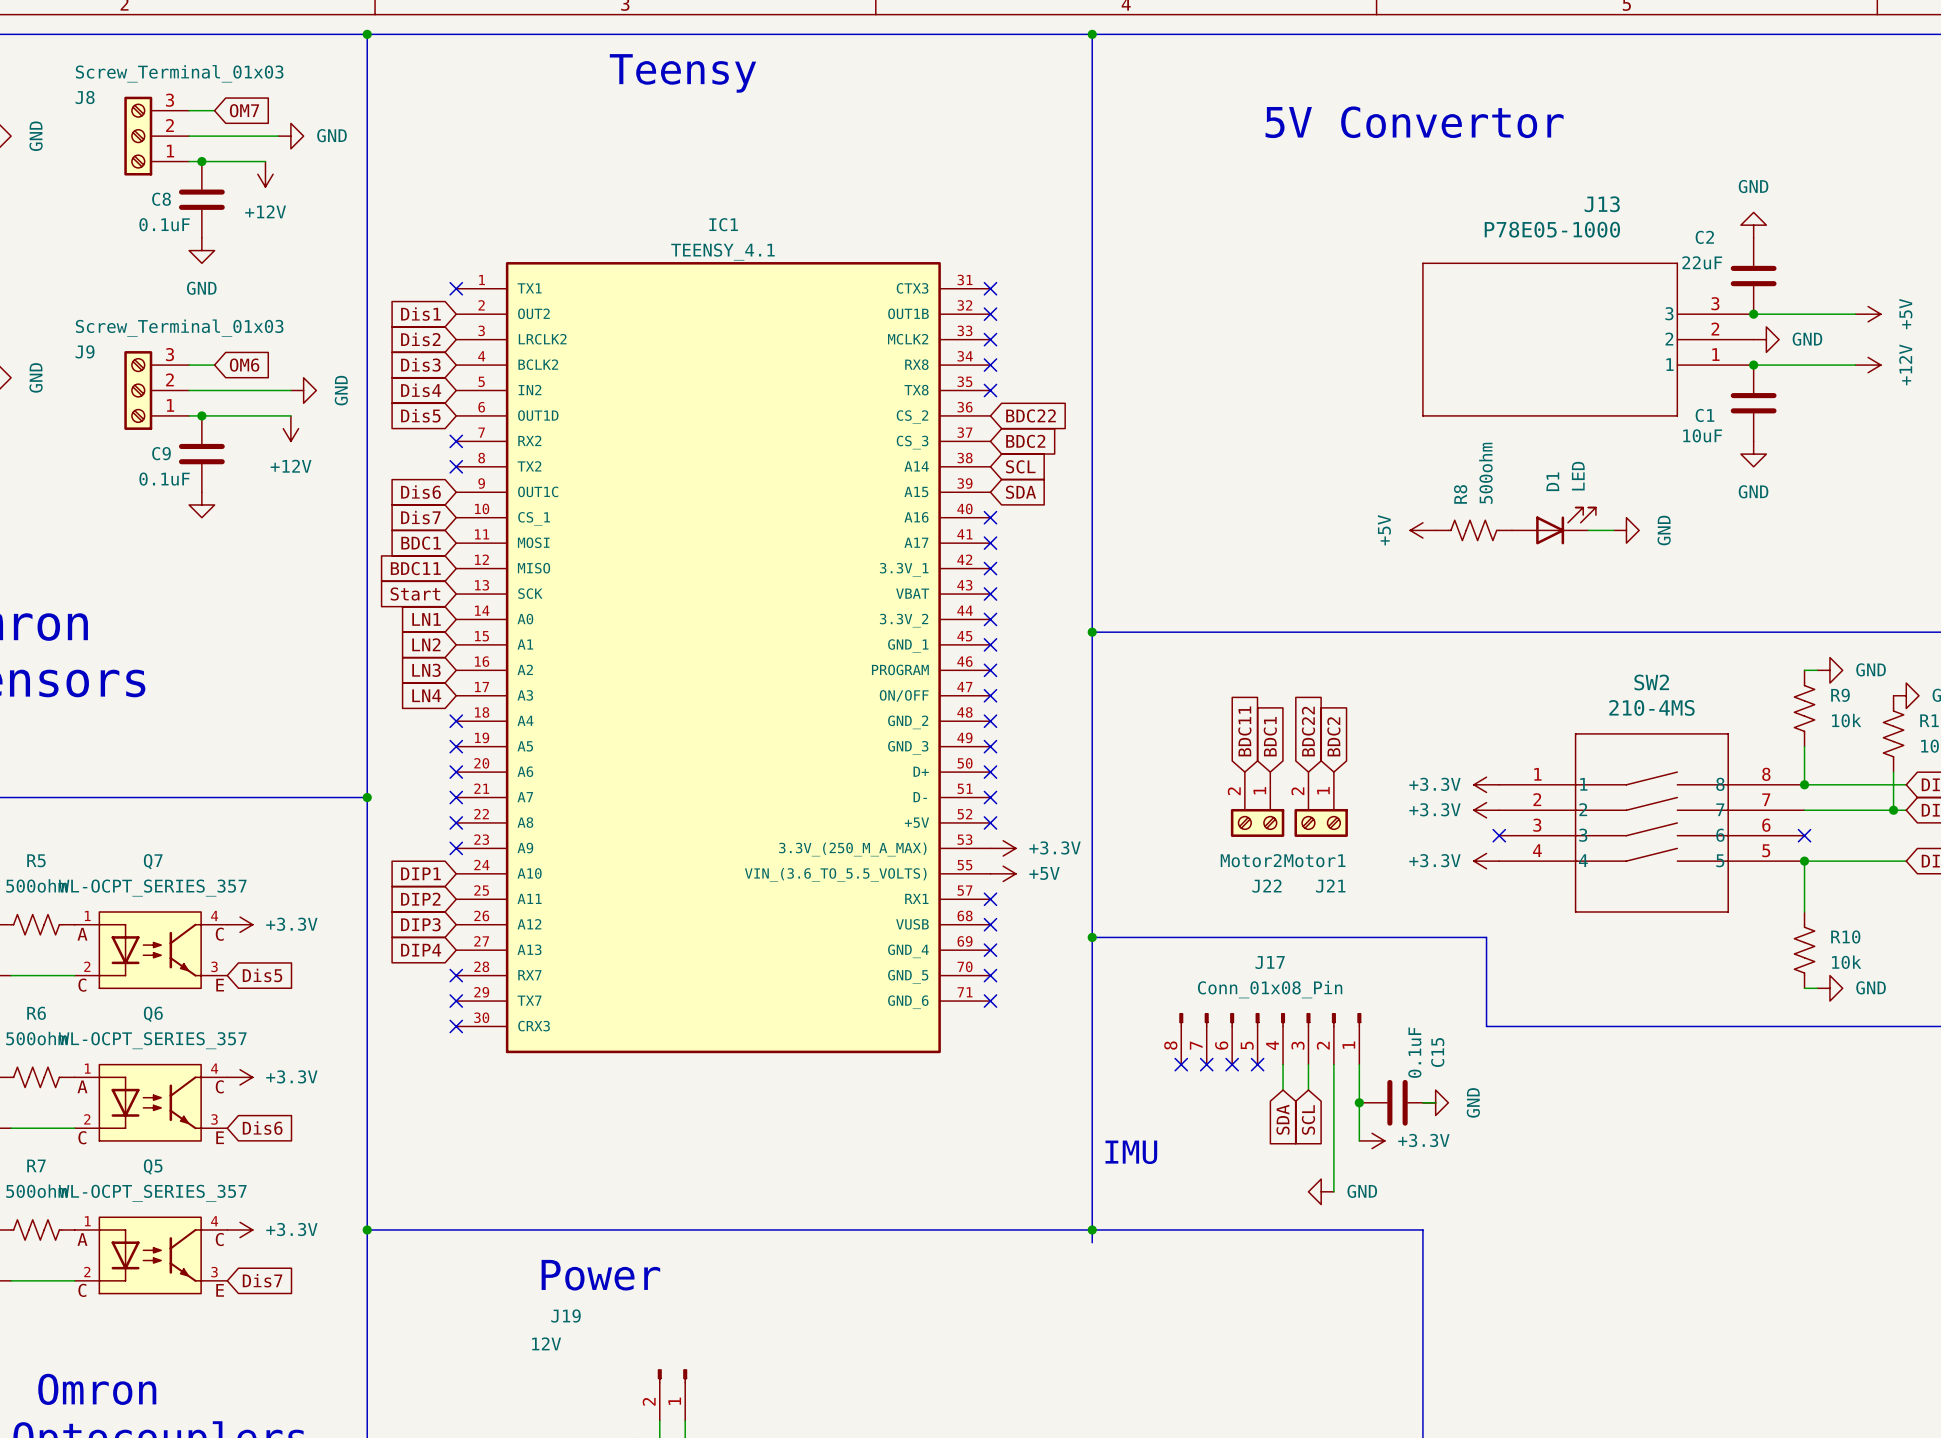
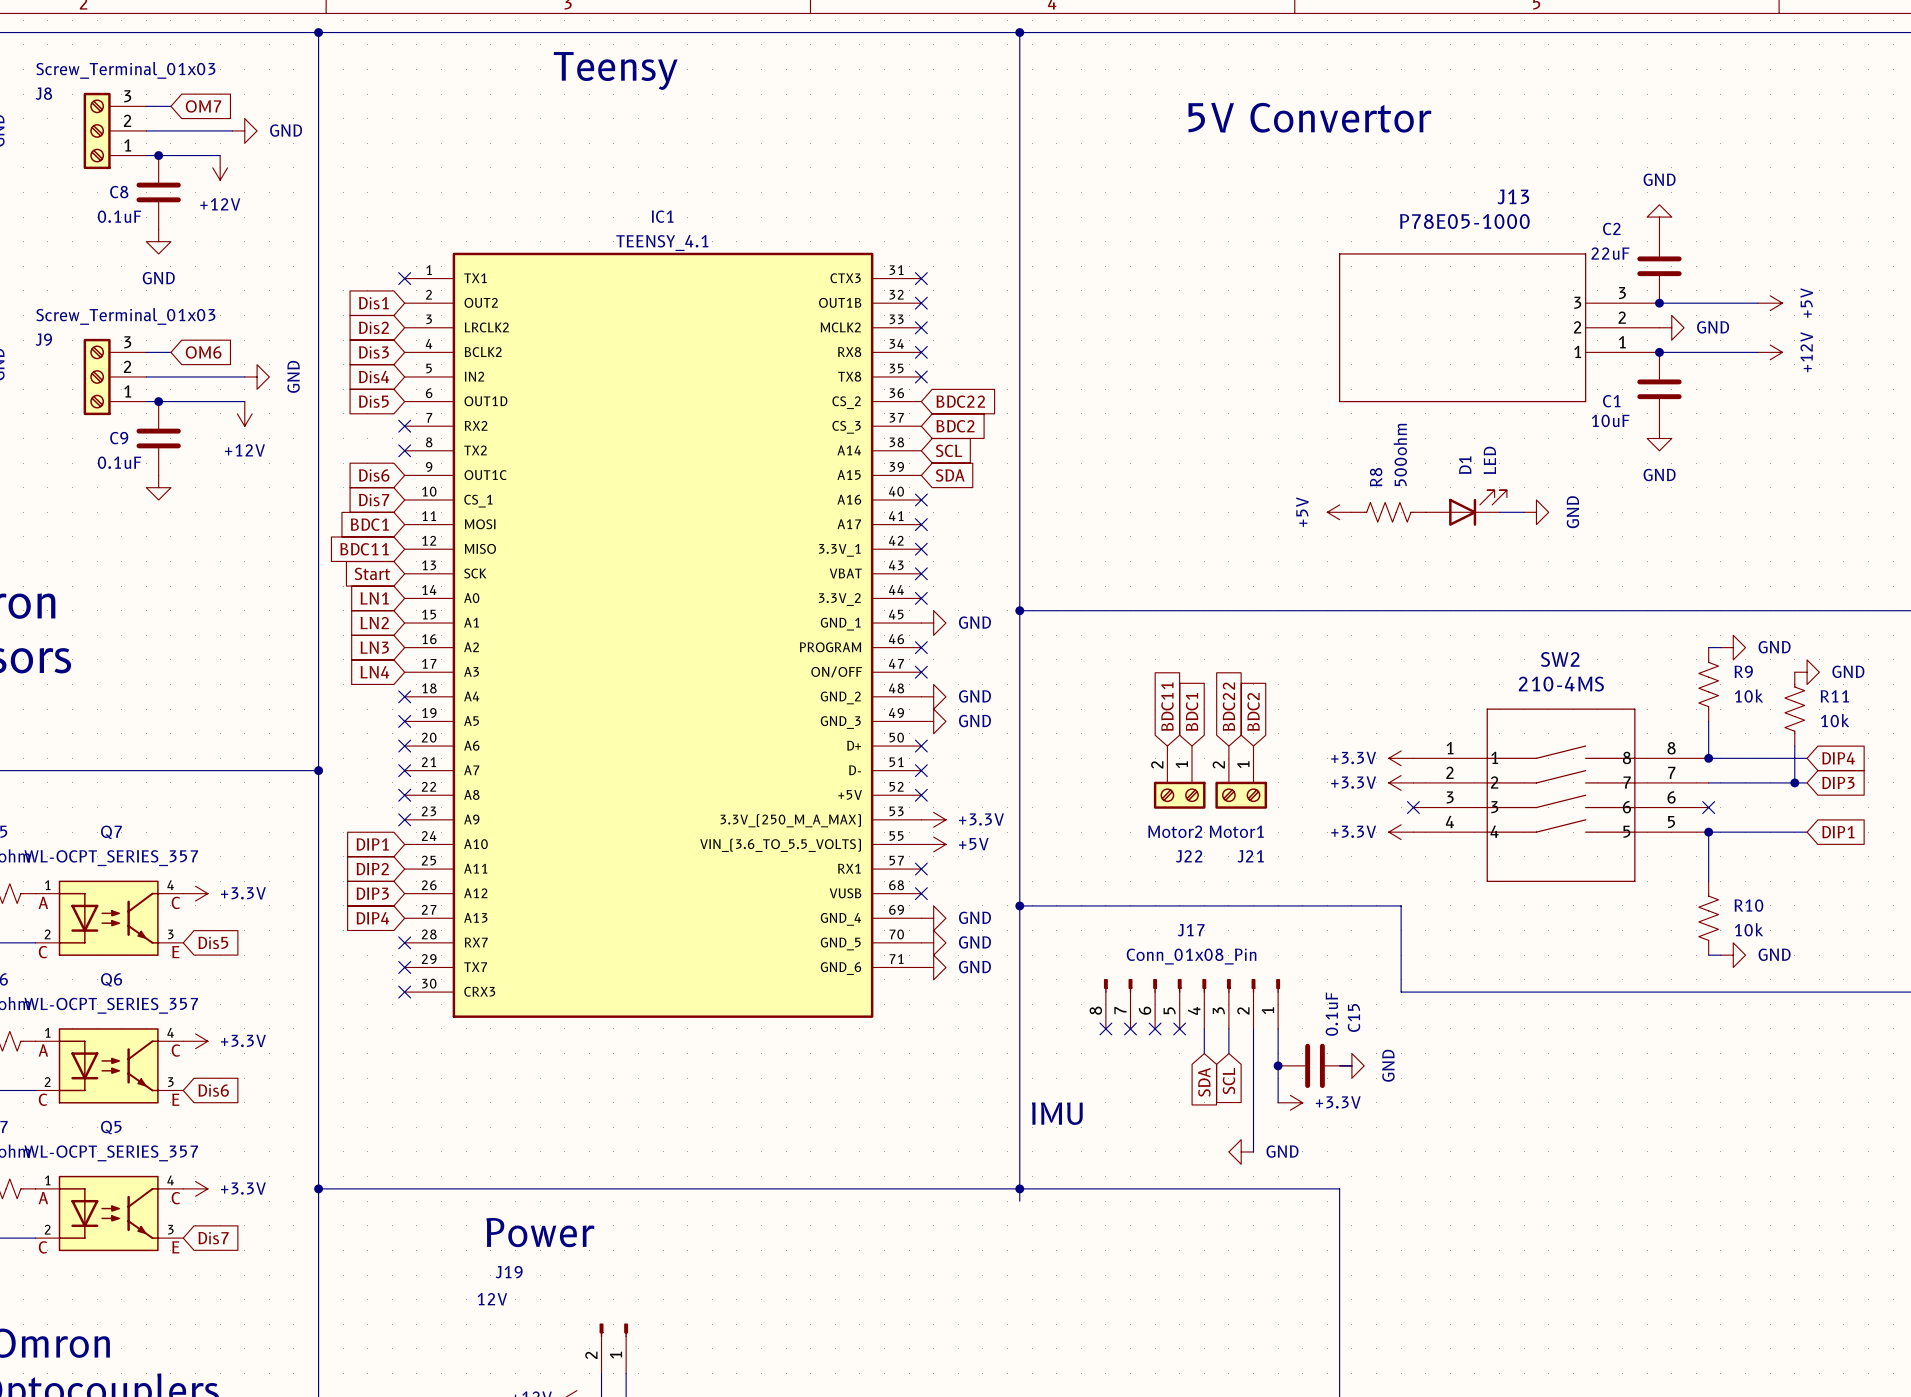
no-connect mark: (990, 644) -> none
power symbol: none -> GND (933, 623)
no-connect mark: (990, 721) -> none
power symbol: none -> GND (933, 696)
no-connect mark: (990, 746) -> none
power symbol: none -> GND (933, 721)
no-connect mark: (990, 950) -> none
power symbol: none -> GND (933, 918)
no-connect mark: (990, 975) -> none
power symbol: none -> GND (933, 942)
no-connect mark: (990, 1001) -> none
power symbol: none -> GND (933, 967)

